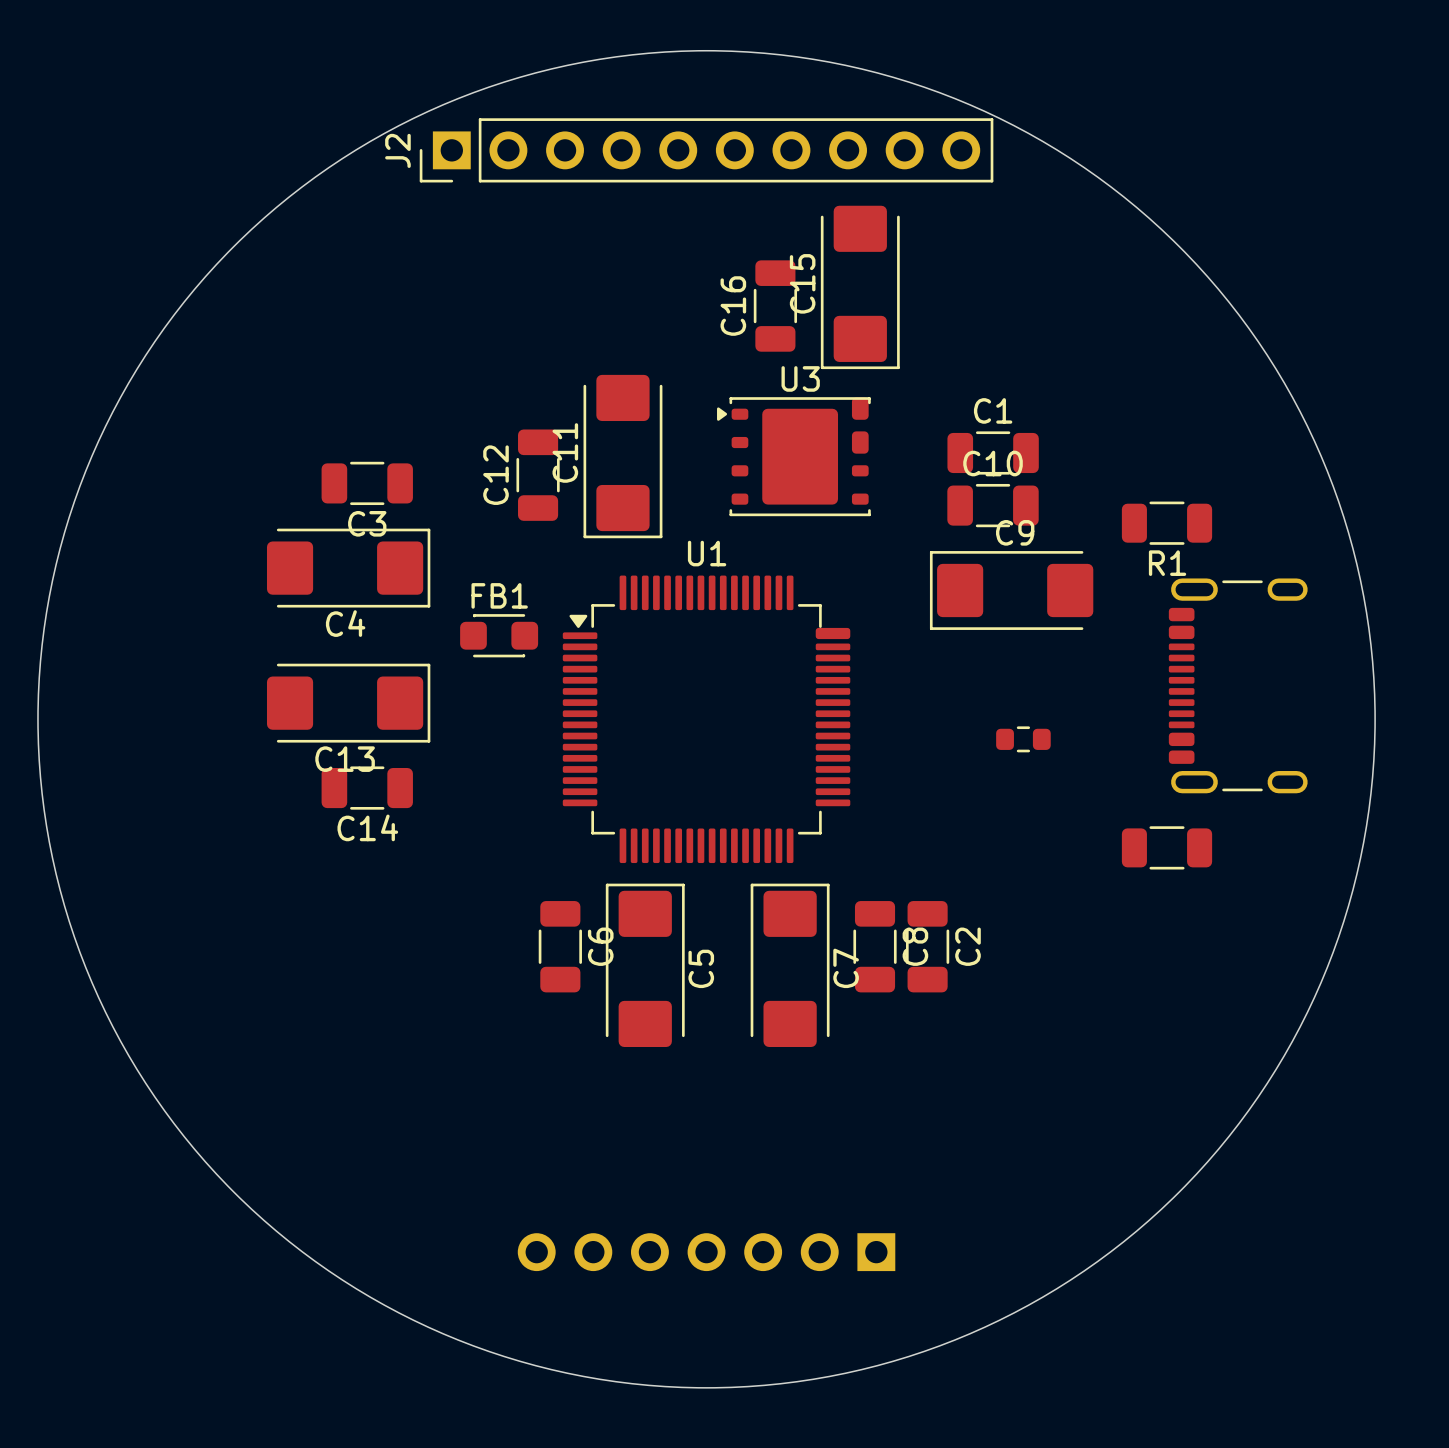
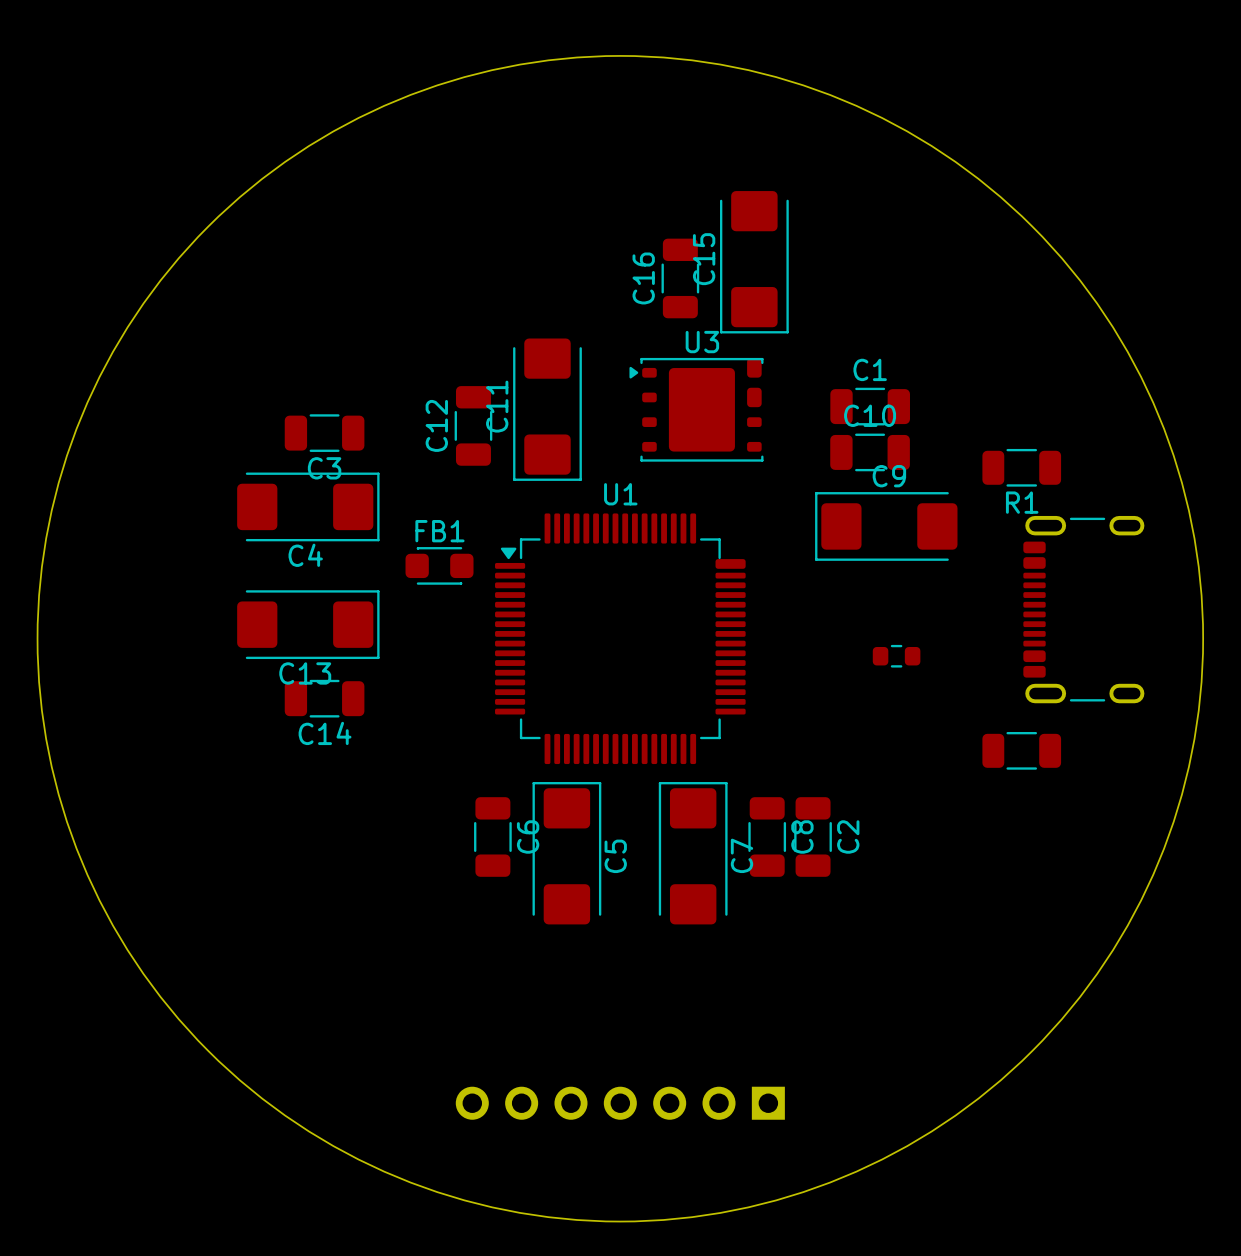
J2: (706, 150) -> none

